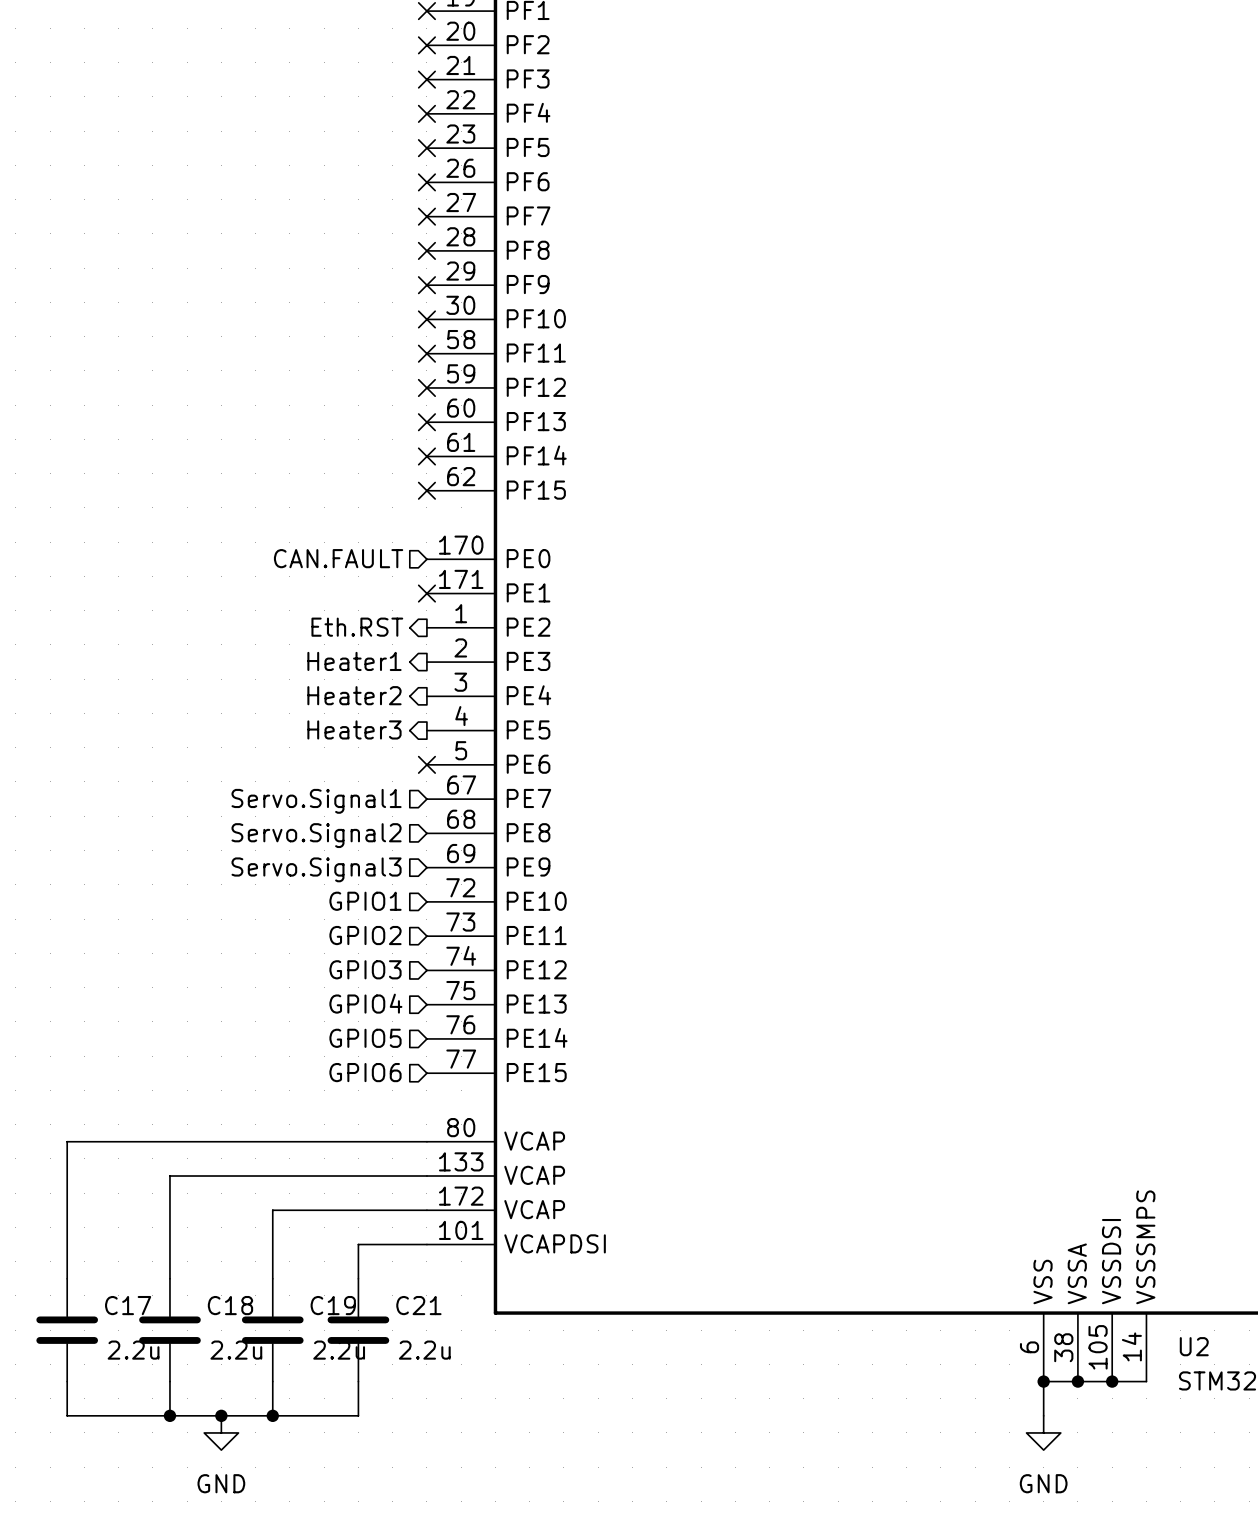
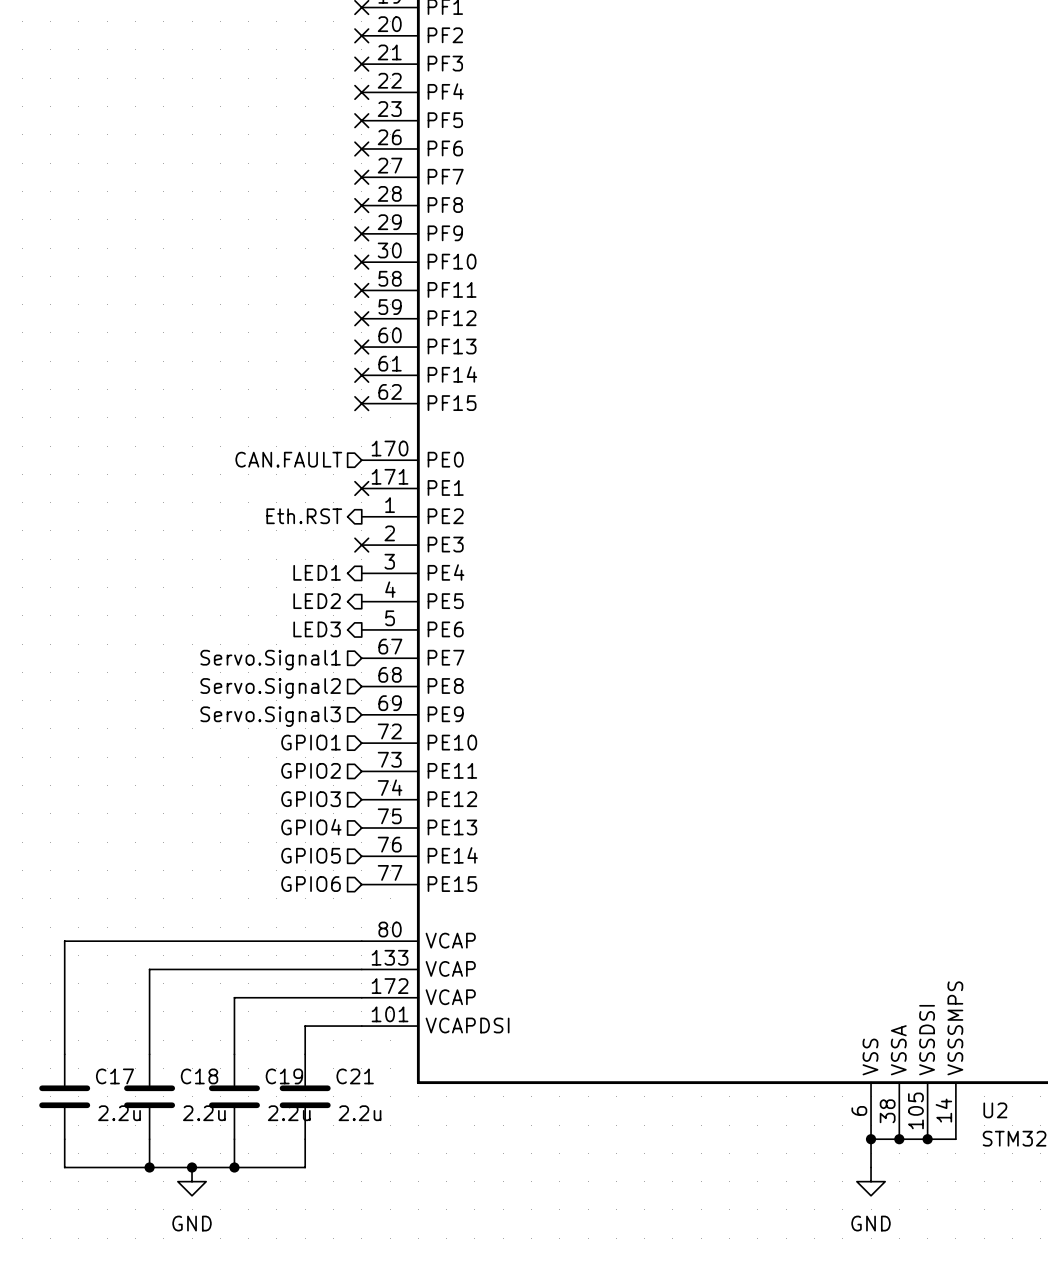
hierarchical label: Heater1 (354, 661) -> none
no-connect mark: none -> (361, 545)
hierarchical label: Heater2 (354, 695) -> LED1 (317, 572)
hierarchical label: Heater3 (354, 729) -> LED2 (317, 601)
hierarchical label: none -> LED3 (317, 629)
no-connect mark: (426, 764) -> none

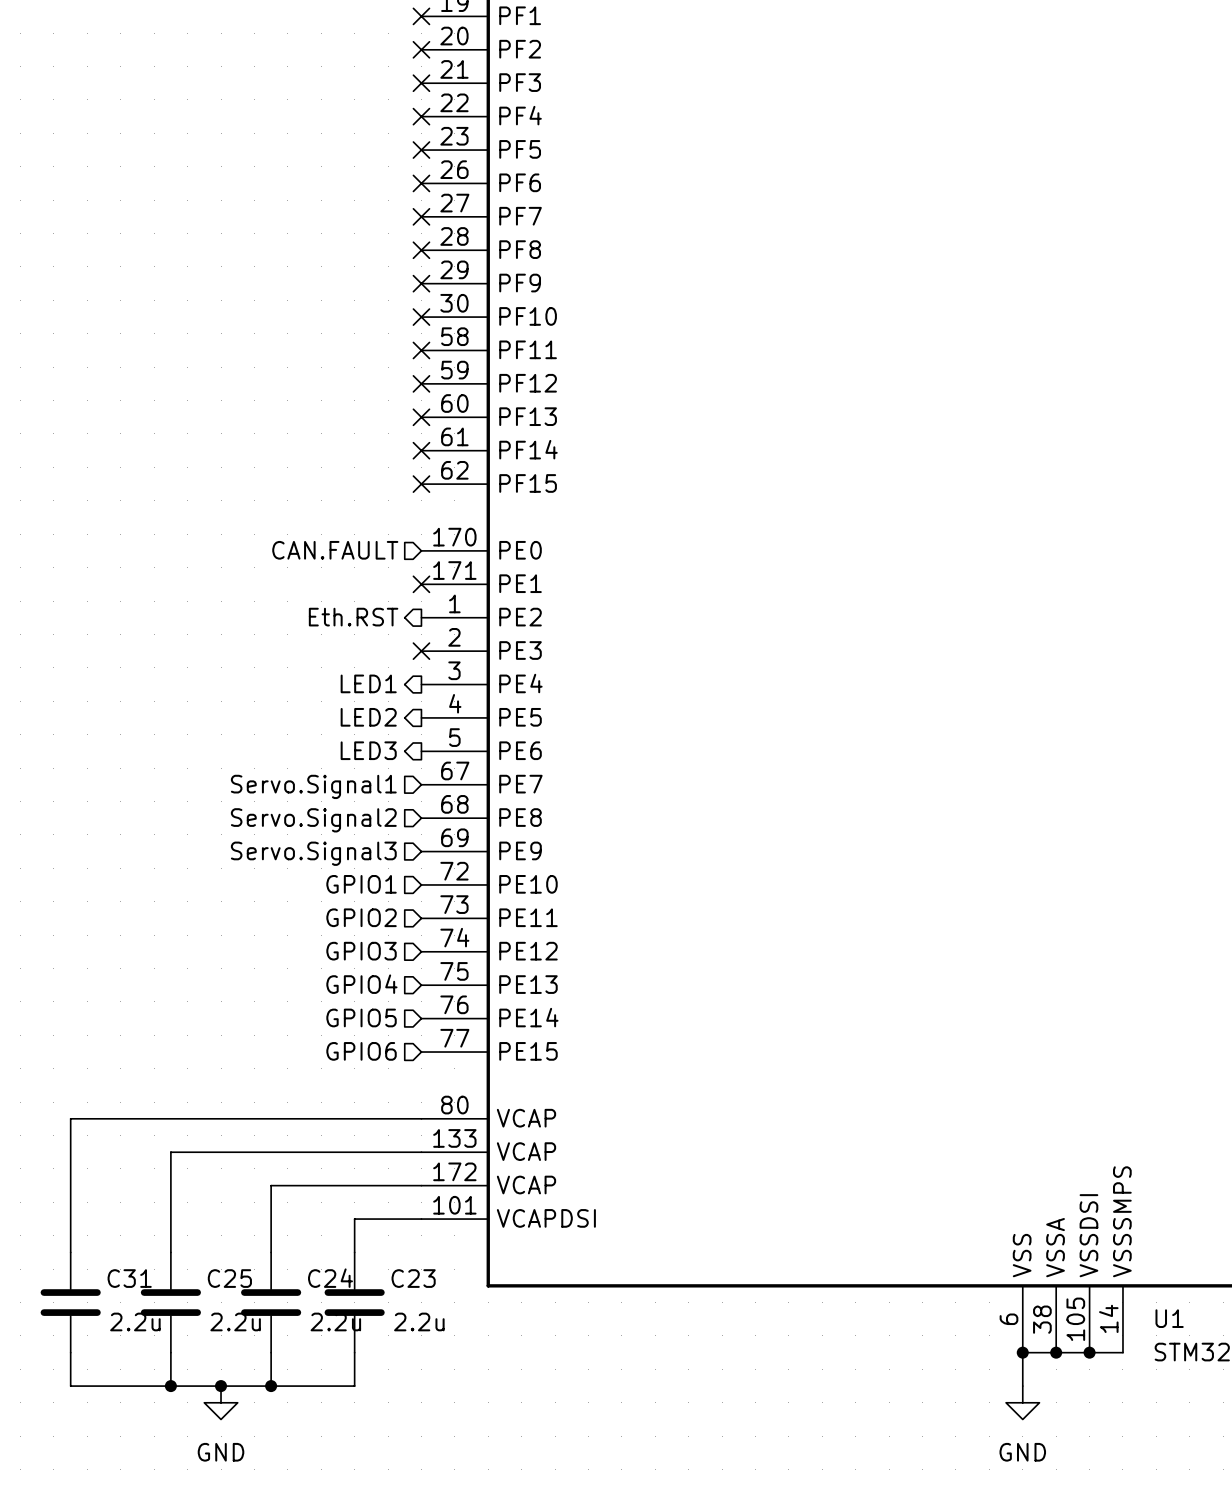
C17 name: C17 (114, 1076) -> C31 (129, 1278)
C18 name: C18 (199, 1076) -> C25 (229, 1278)
C19 name: C19 (284, 1076) -> C24 (330, 1278)
C21 name: C21 (355, 1076) -> C23 (413, 1278)
U2 name: U2 (995, 1110) -> U1 (1169, 1318)

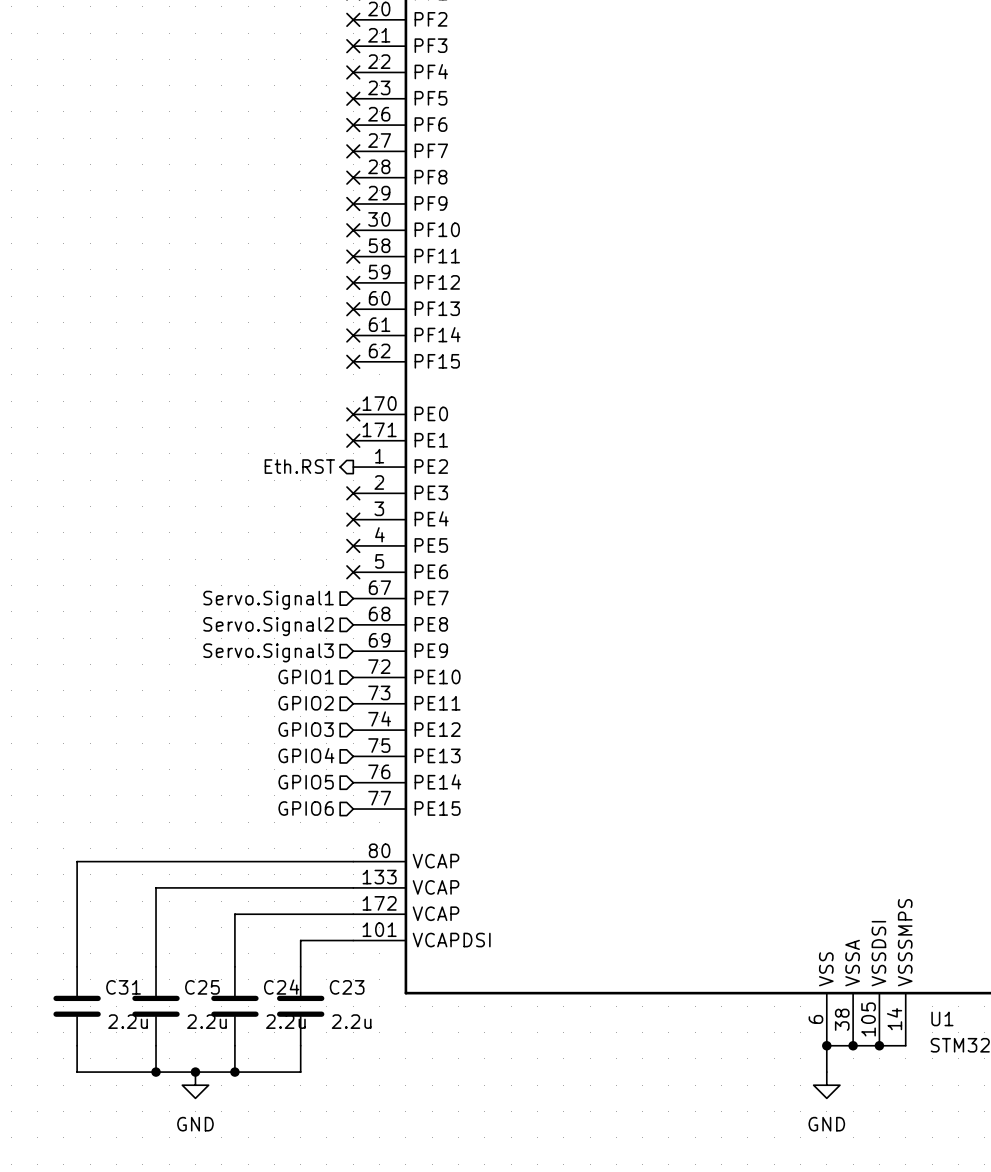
hierarchical label: CAN.FAULT (335, 550) -> none
no-connect mark: none -> (353, 414)
hierarchical label: LED1 (368, 683) -> none
no-connect mark: none -> (353, 519)
hierarchical label: LED2 (368, 717) -> none
no-connect mark: none -> (353, 545)
hierarchical label: LED3 (368, 750) -> none
no-connect mark: none -> (353, 572)

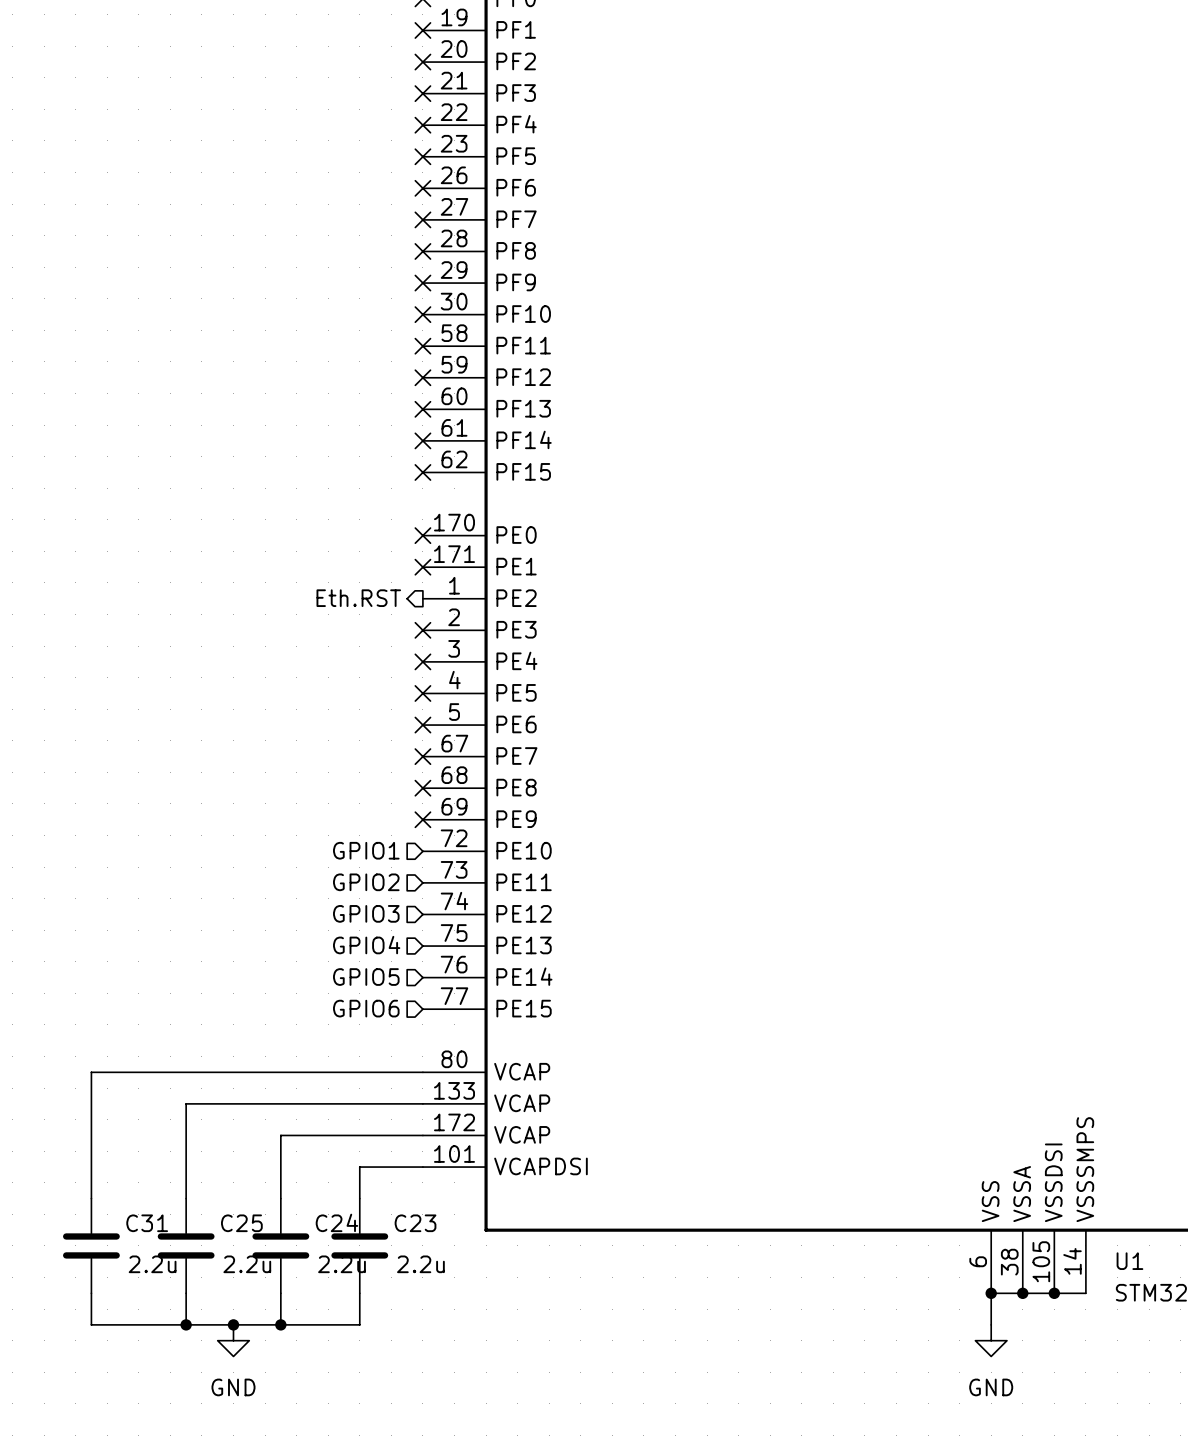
no-connect mark: none -> (422, 756)
hierarchical label: Servo.Signal1 (268, 600) -> none
no-connect mark: none -> (422, 788)
hierarchical label: Servo.Signal2 (268, 626) -> none
no-connect mark: none -> (422, 819)
hierarchical label: Servo.Signal3 (268, 652) -> none

